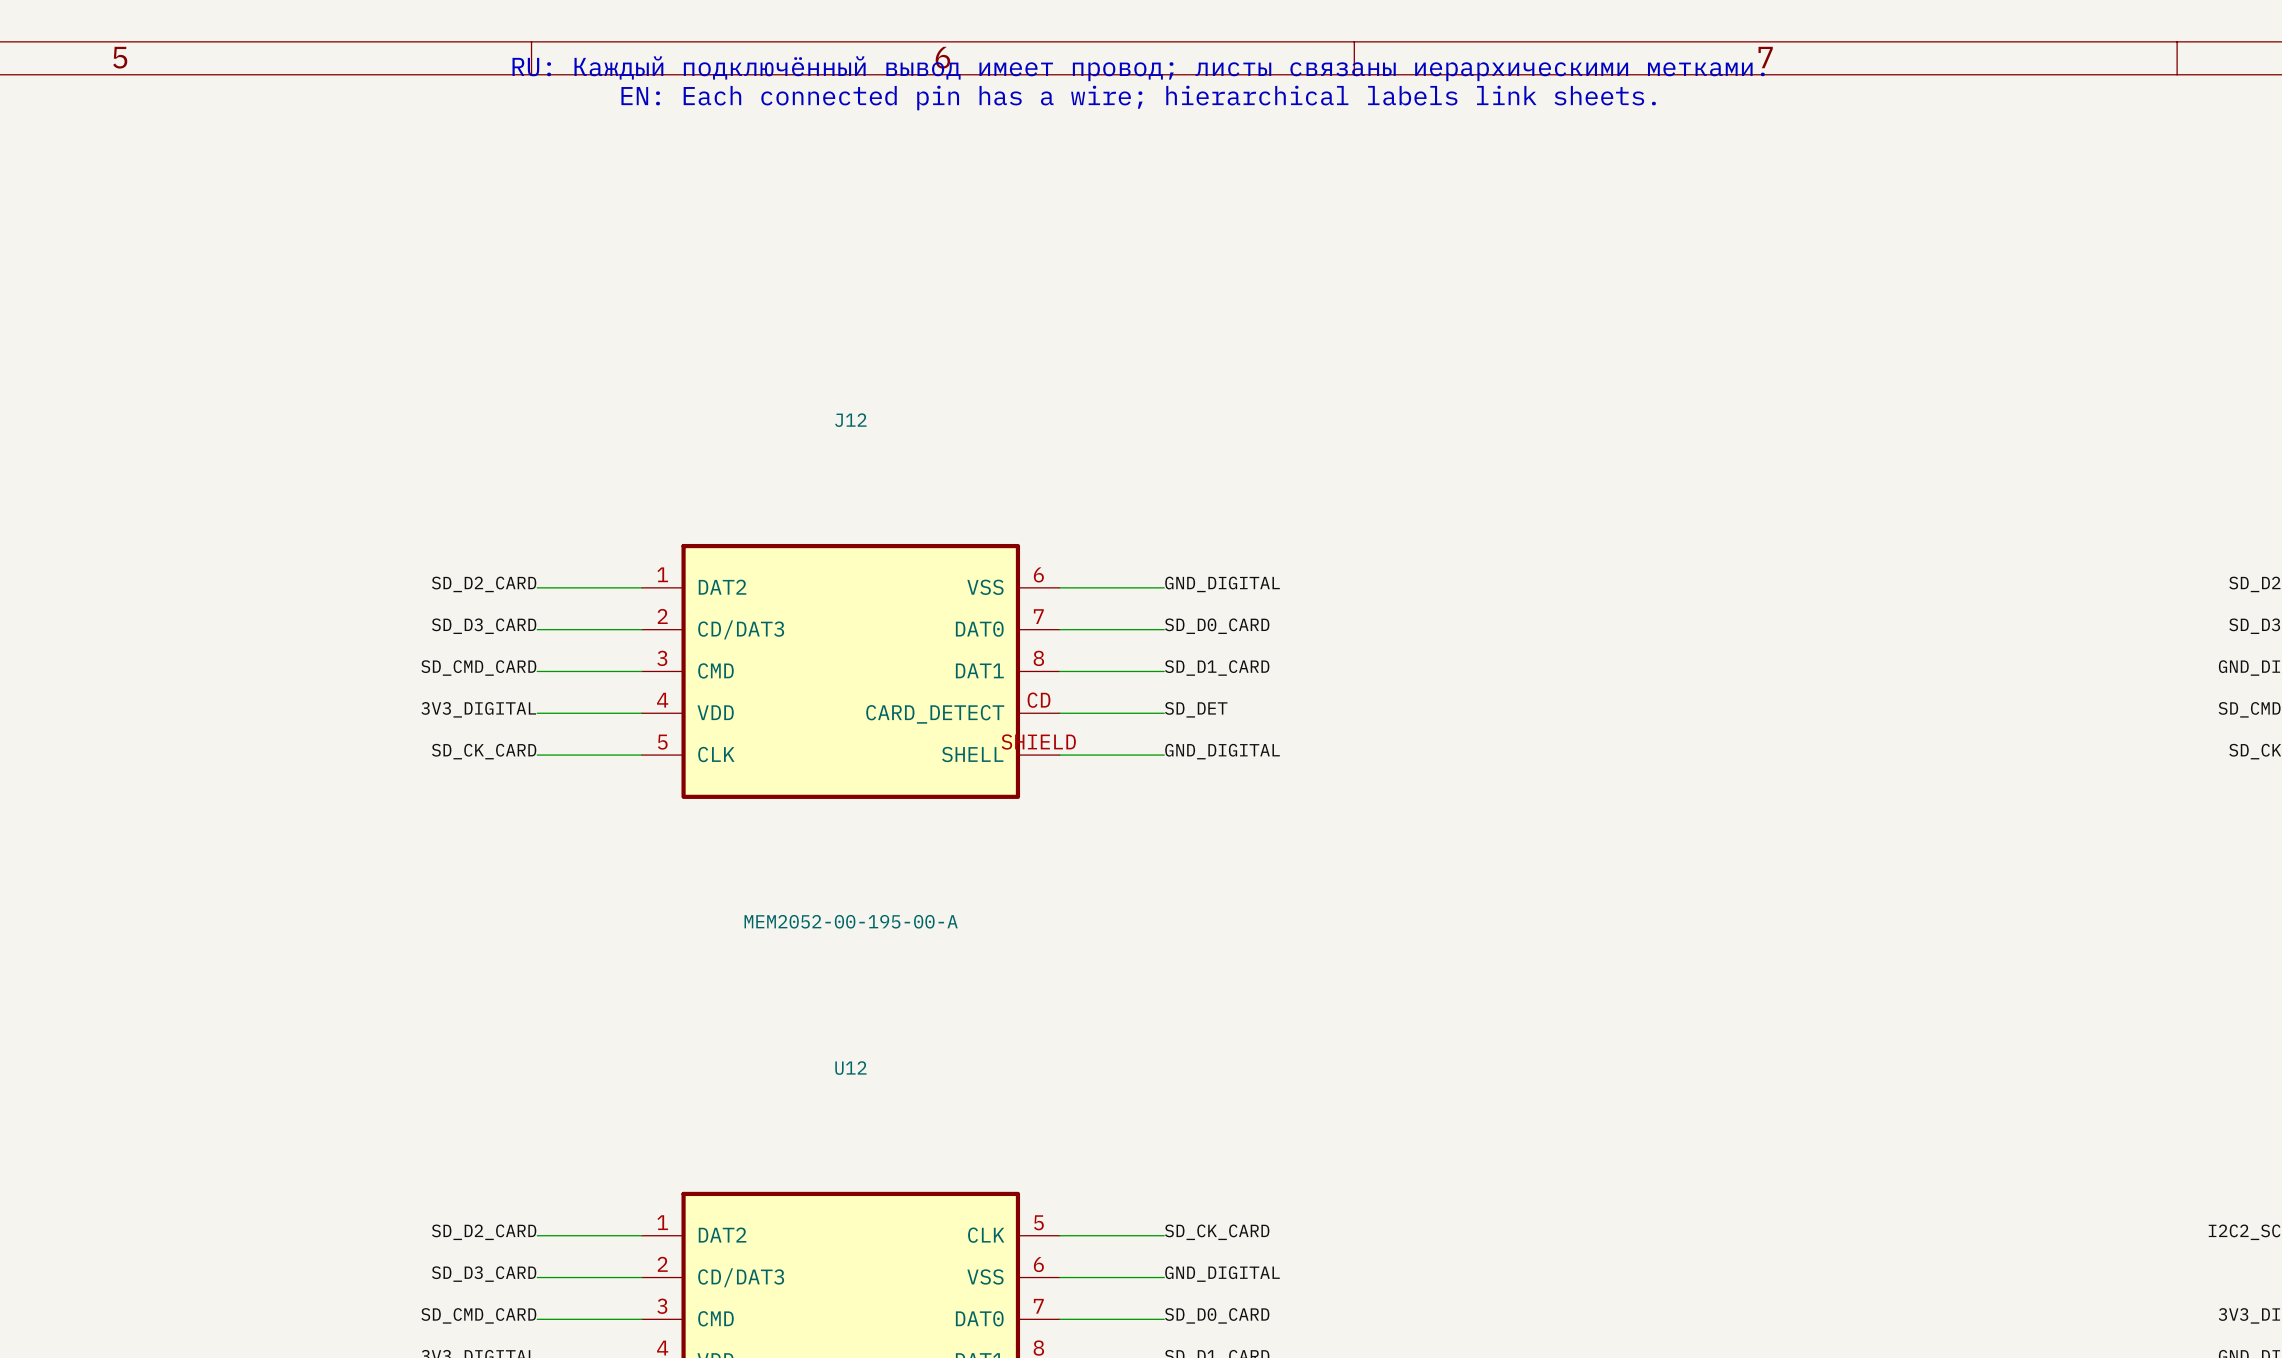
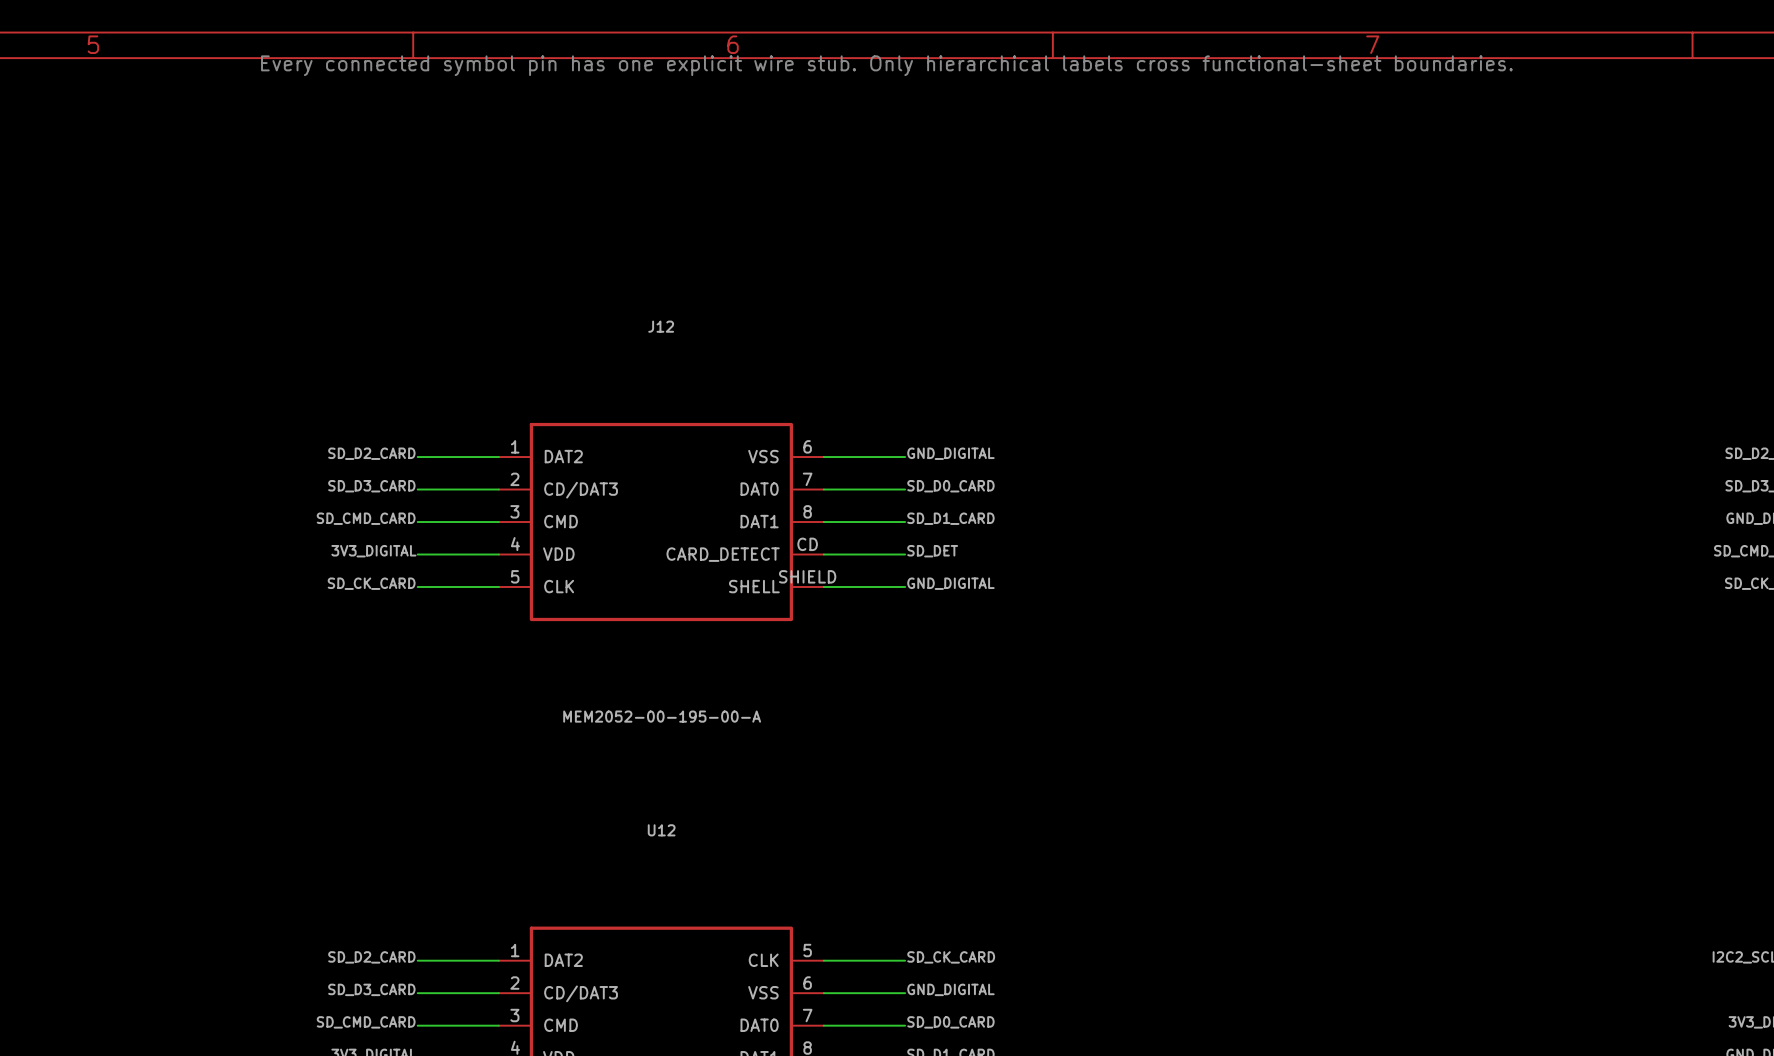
text: RU: Каждый подключённый вывод имеет провод; листы связаны иерархическими метками. (1138, 68) -> none
text: none -> Every connected symbol pin has one explicit wire stub. Only hierarchical labels cross functional-sheet boundaries. (886, 65)
text: EN: Each connected pin has a wire; hierarchical labels link sheets. (1138, 98) -> none

